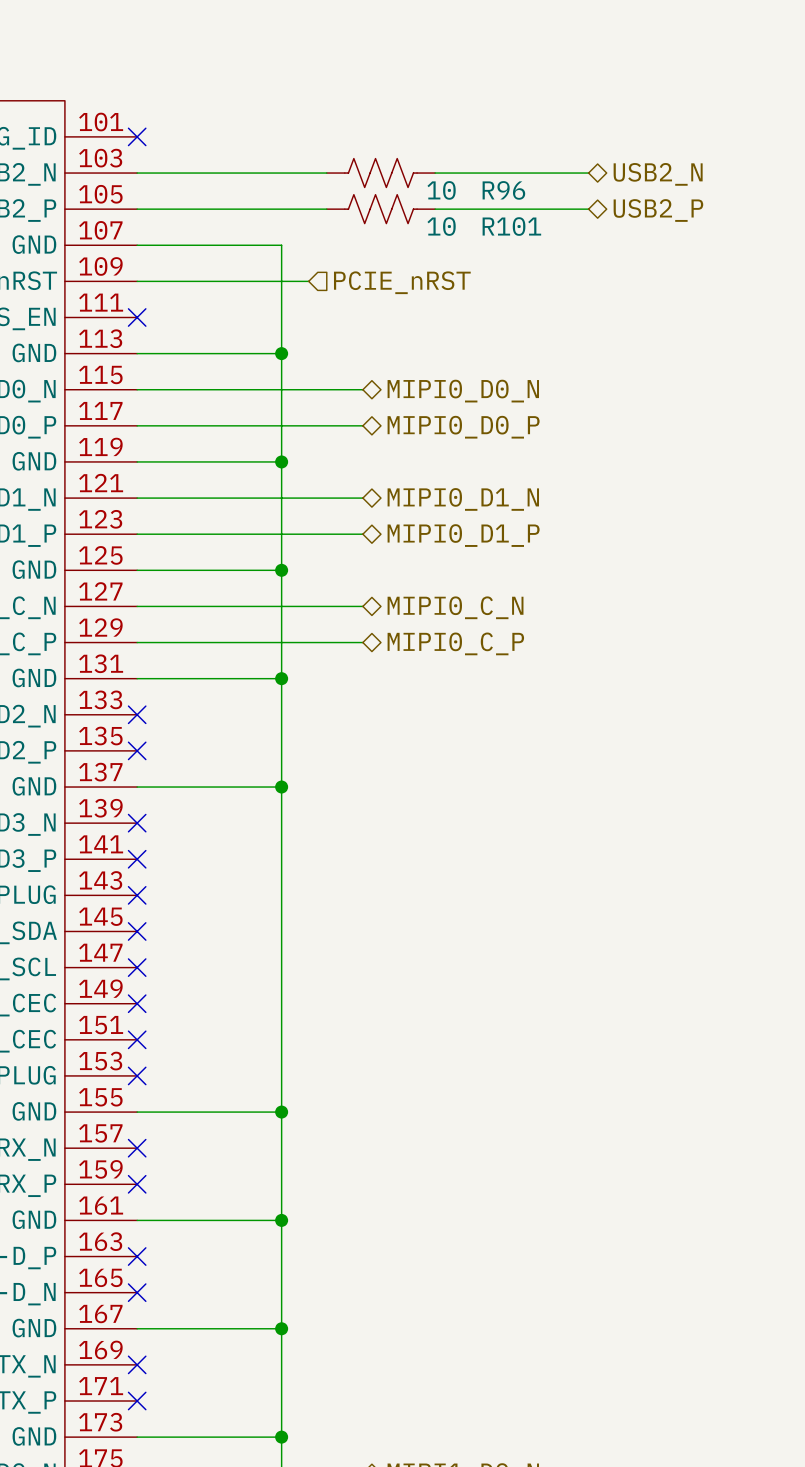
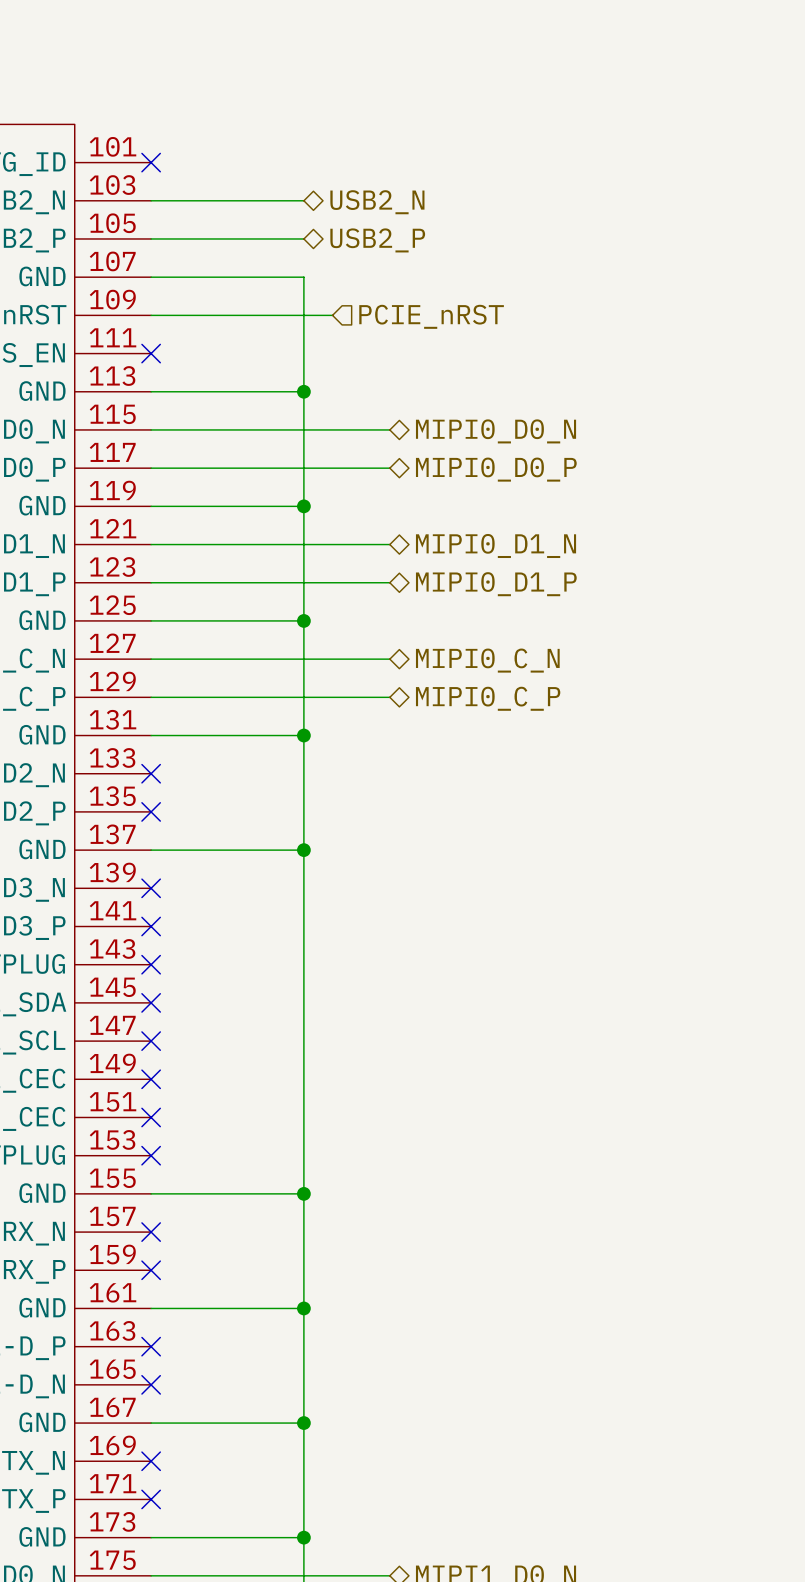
wire: (281, 173) (326, 173) -> none
R96: 10 (380, 173) -> none
wire: (435, 173) (588, 173) -> none
hierarchical label position: USB2_N (658, 174) -> USB2_N (377, 202)
wire: (281, 209) (326, 209) -> none
R101: 10 (380, 209) -> none
wire: (435, 209) (588, 209) -> none
hierarchical label position: USB2_P (658, 210) -> USB2_P (377, 240)

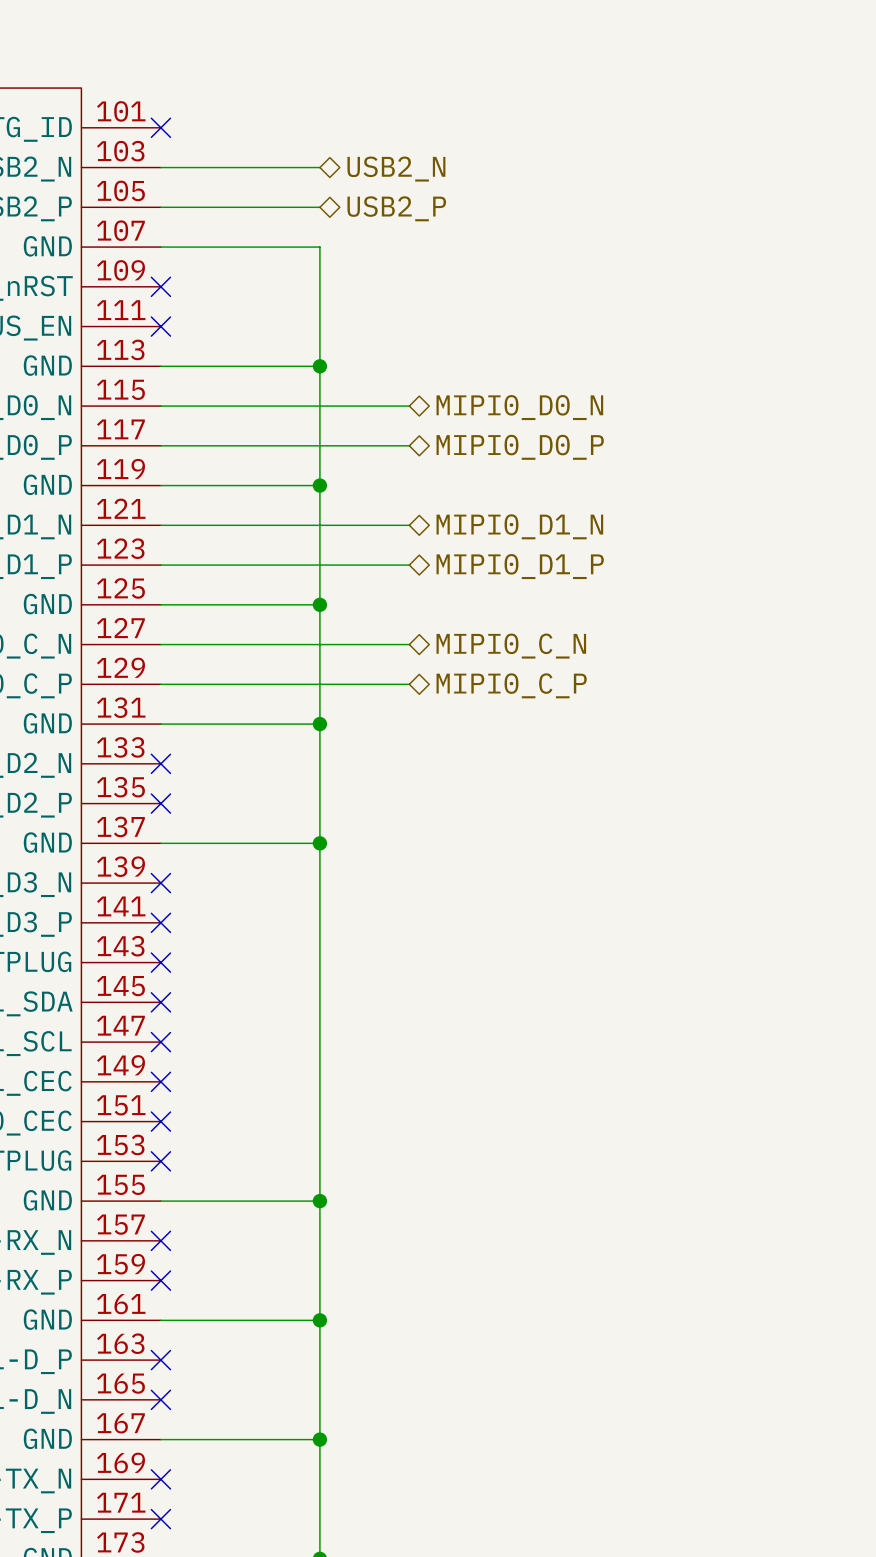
wire: (151, 315) (332, 315) -> none
no-connect mark: none -> (160, 286)
hierarchical label: PCIE_nRST (431, 316) -> none

